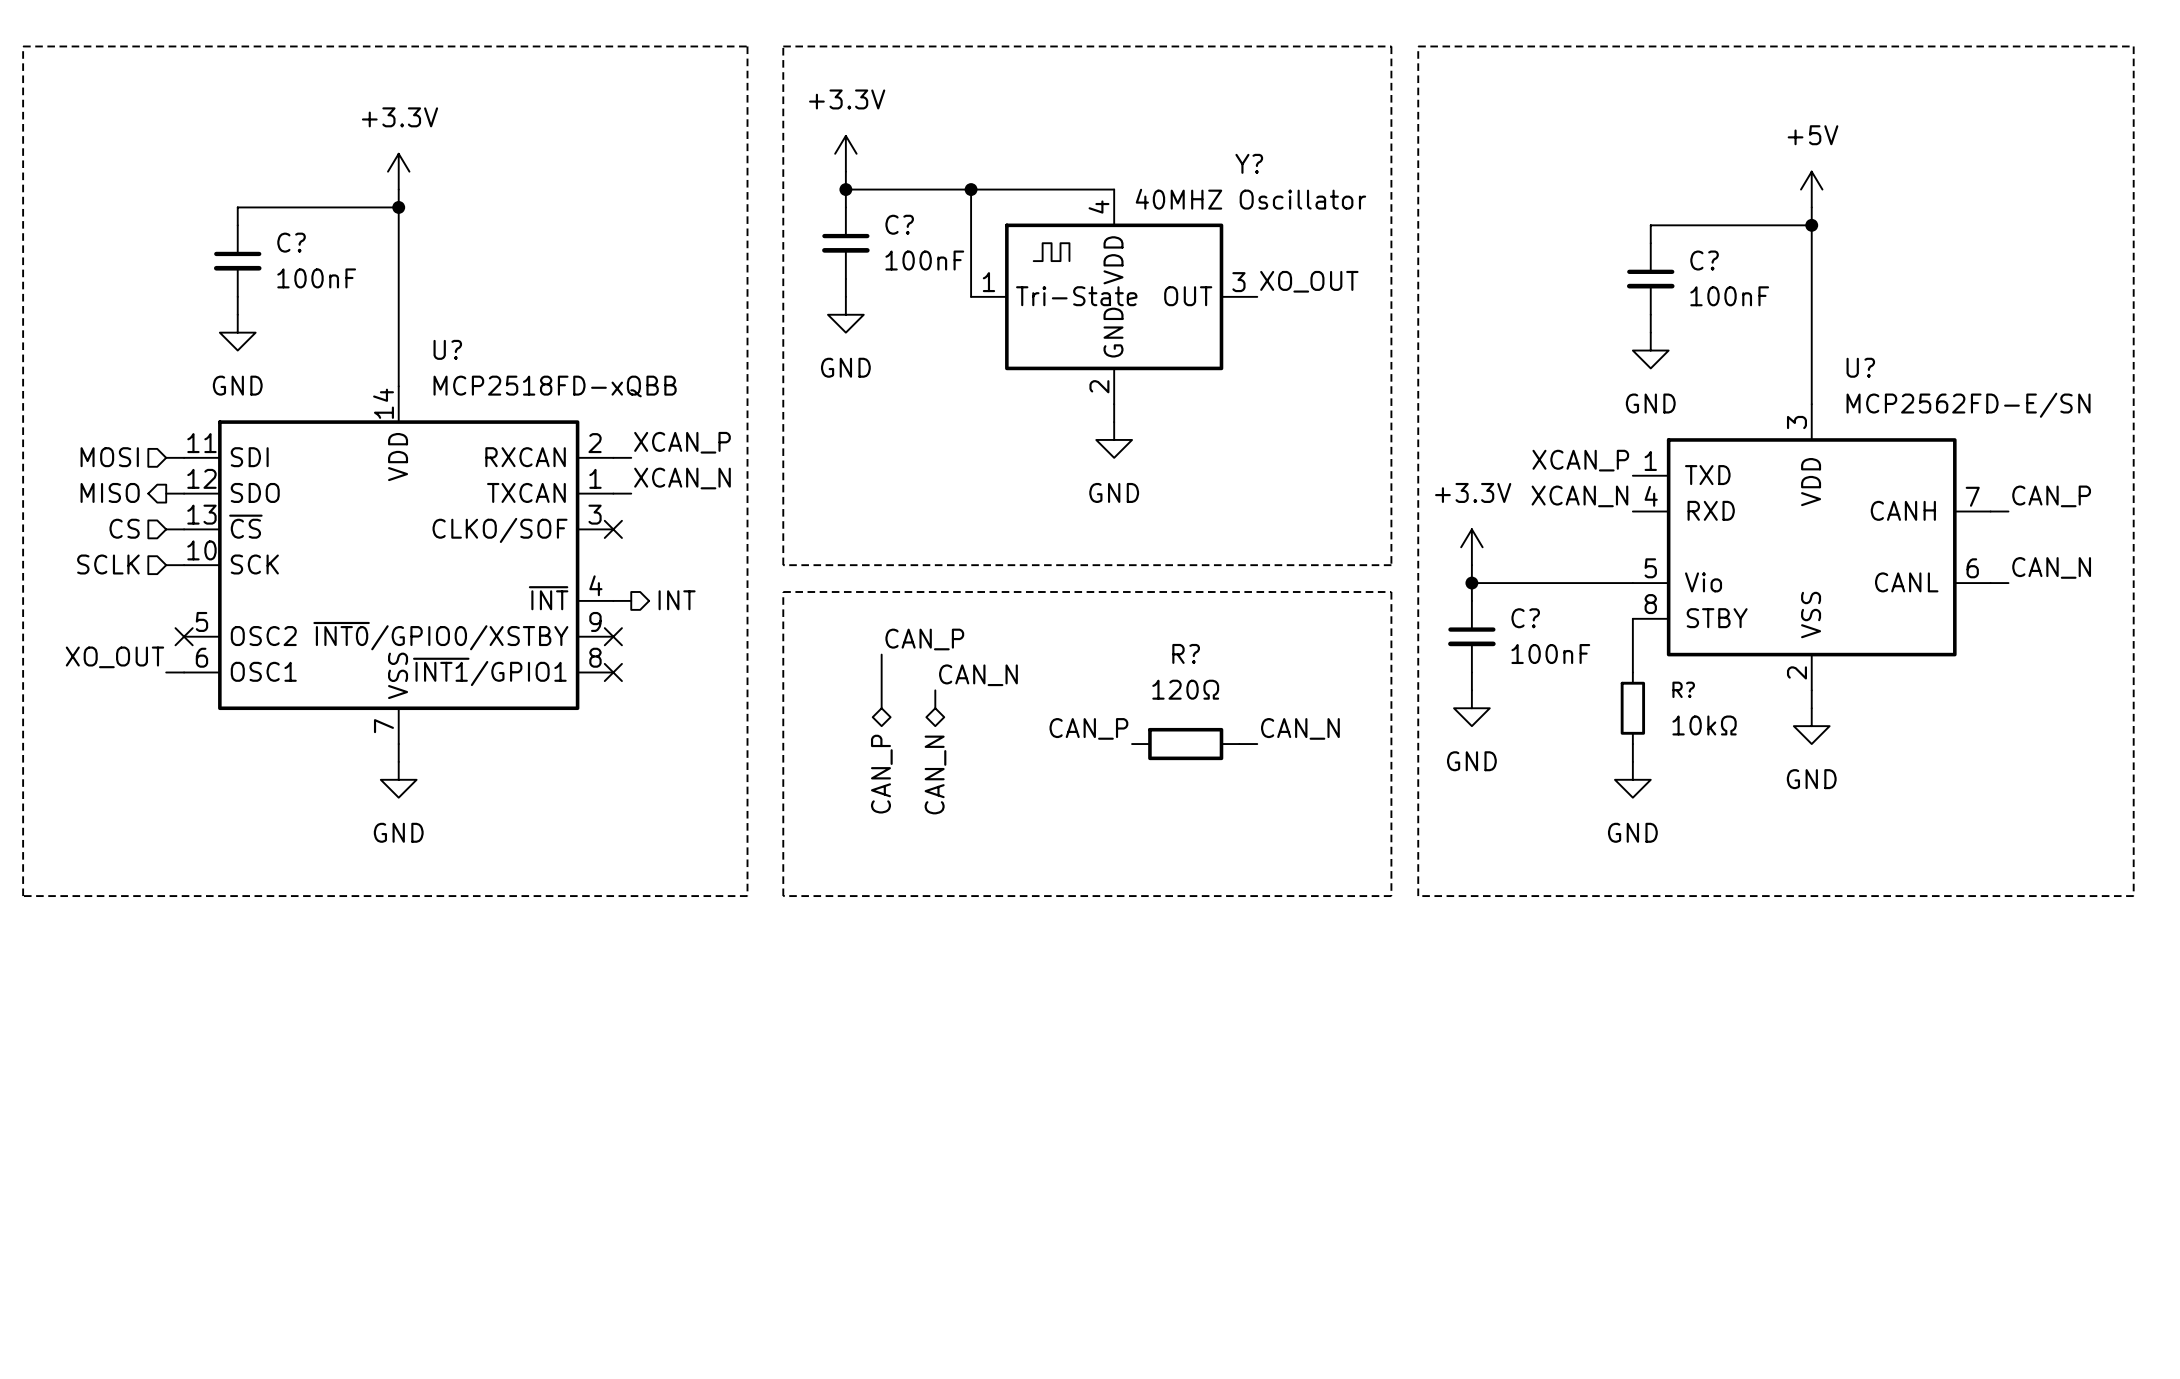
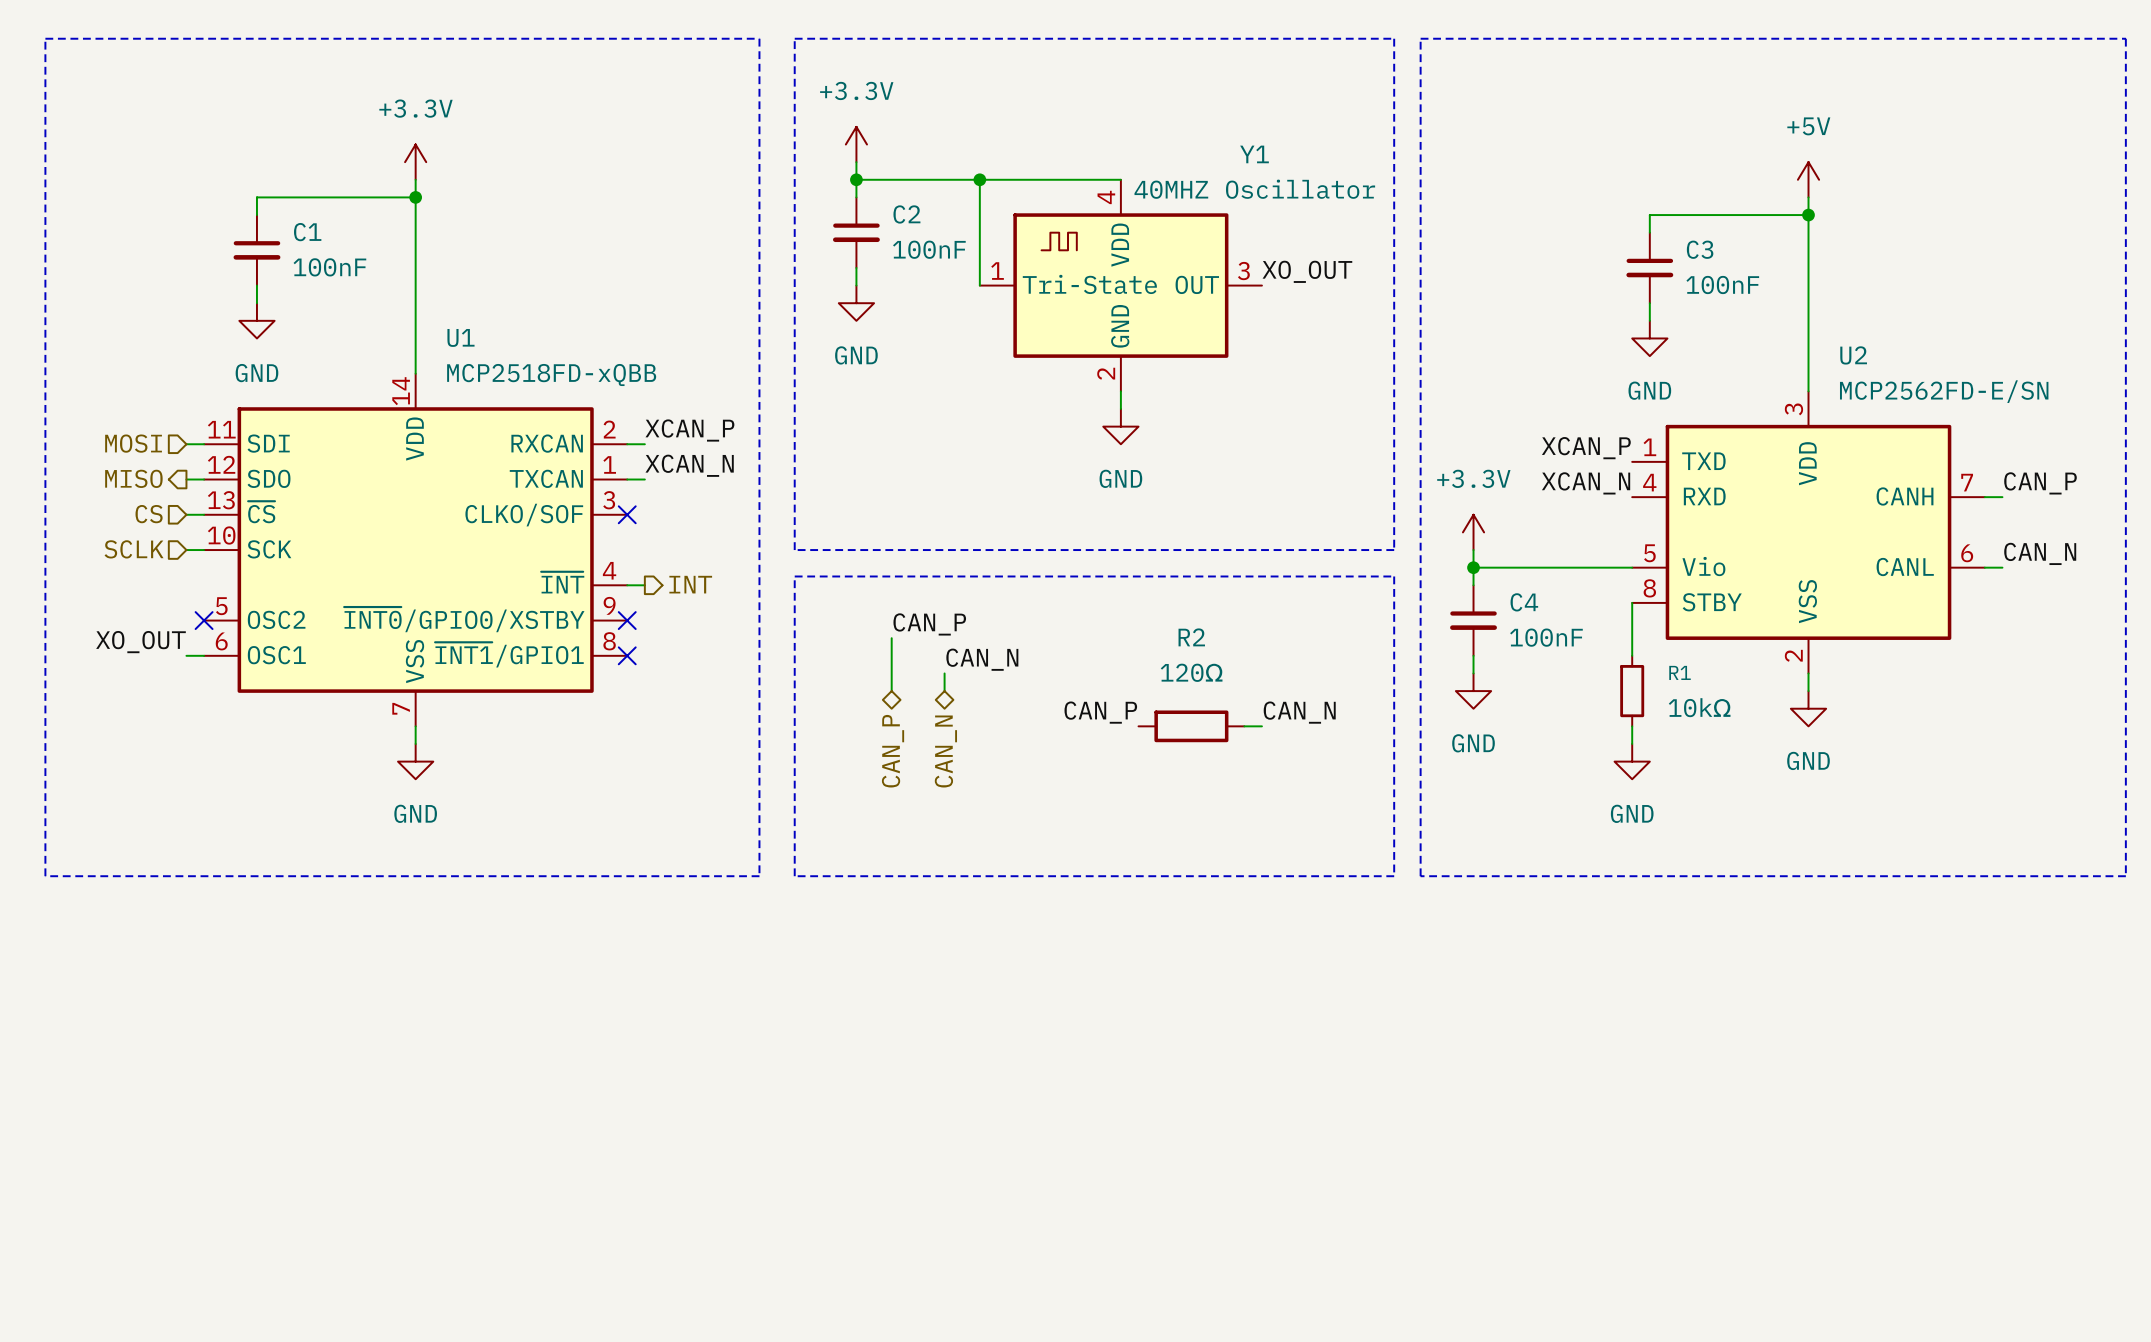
Y? name: Y? (1249, 163) -> Y1 (1254, 154)
C? name: C? (899, 224) -> C2 (906, 214)
C? name: C? (291, 242) -> C1 (307, 232)
C? name: C? (1704, 260) -> C3 (1700, 249)
U? name: U? (447, 349) -> U1 (460, 337)
U? name: U? (1860, 367) -> U2 (1853, 355)
C? name: C? (1525, 618) -> C4 (1524, 602)
R? name: R? (1186, 653) -> R2 (1191, 637)
R? name: R? (1683, 689) -> R1 (1680, 672)

